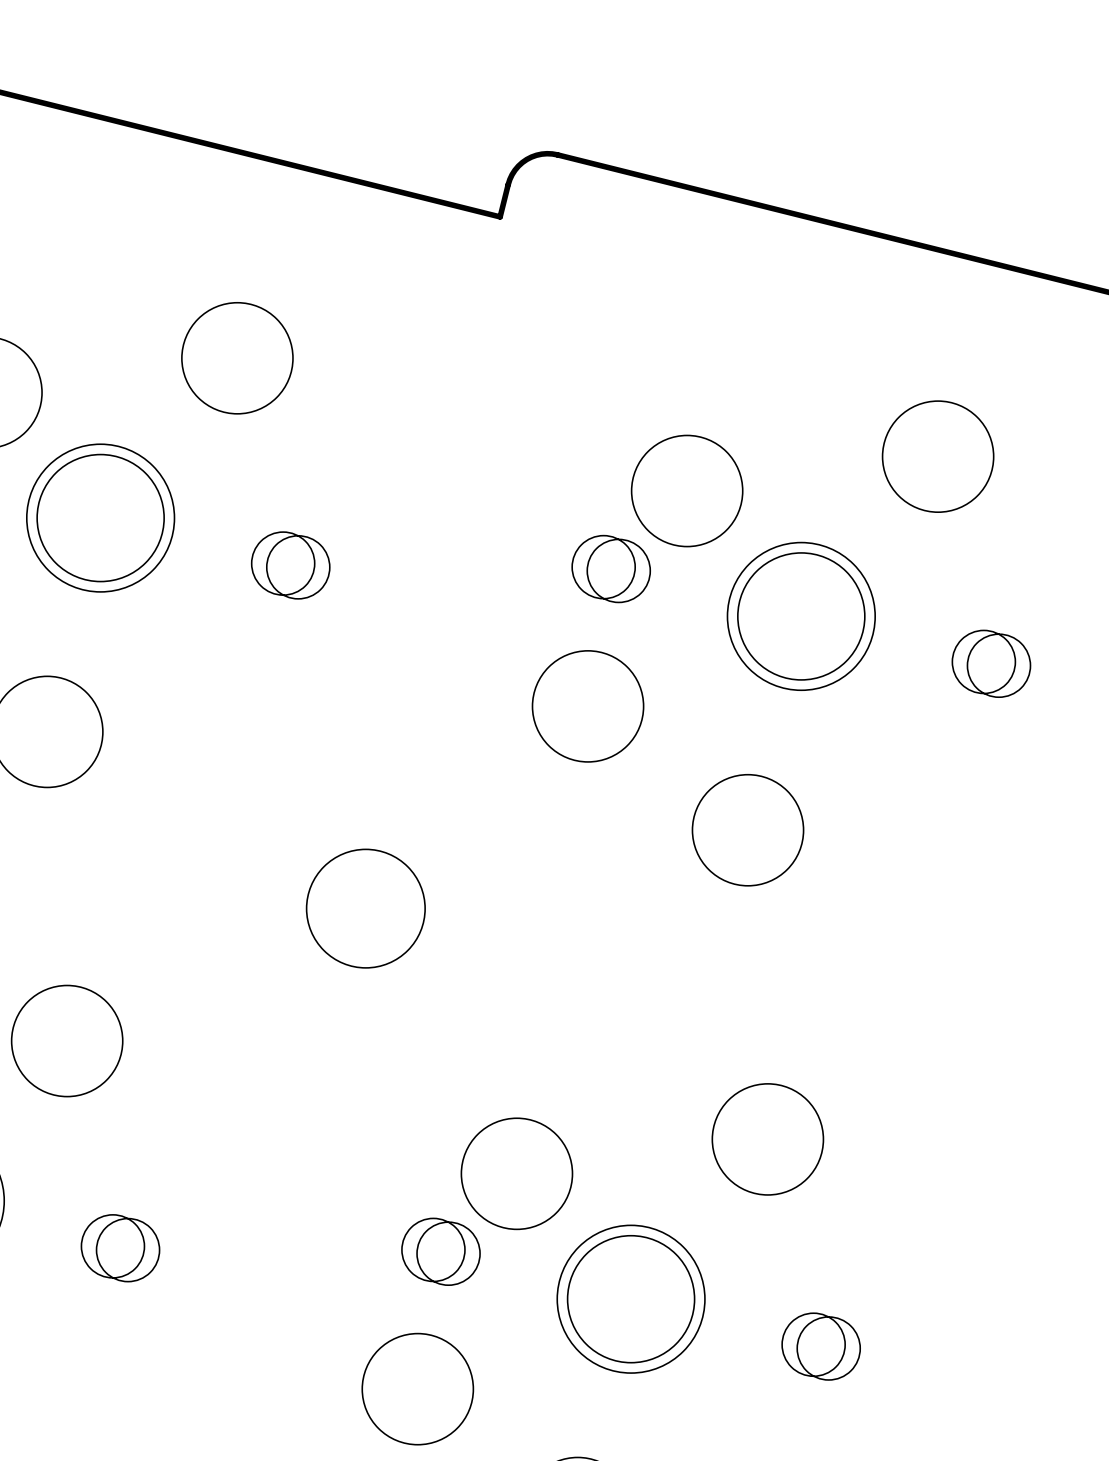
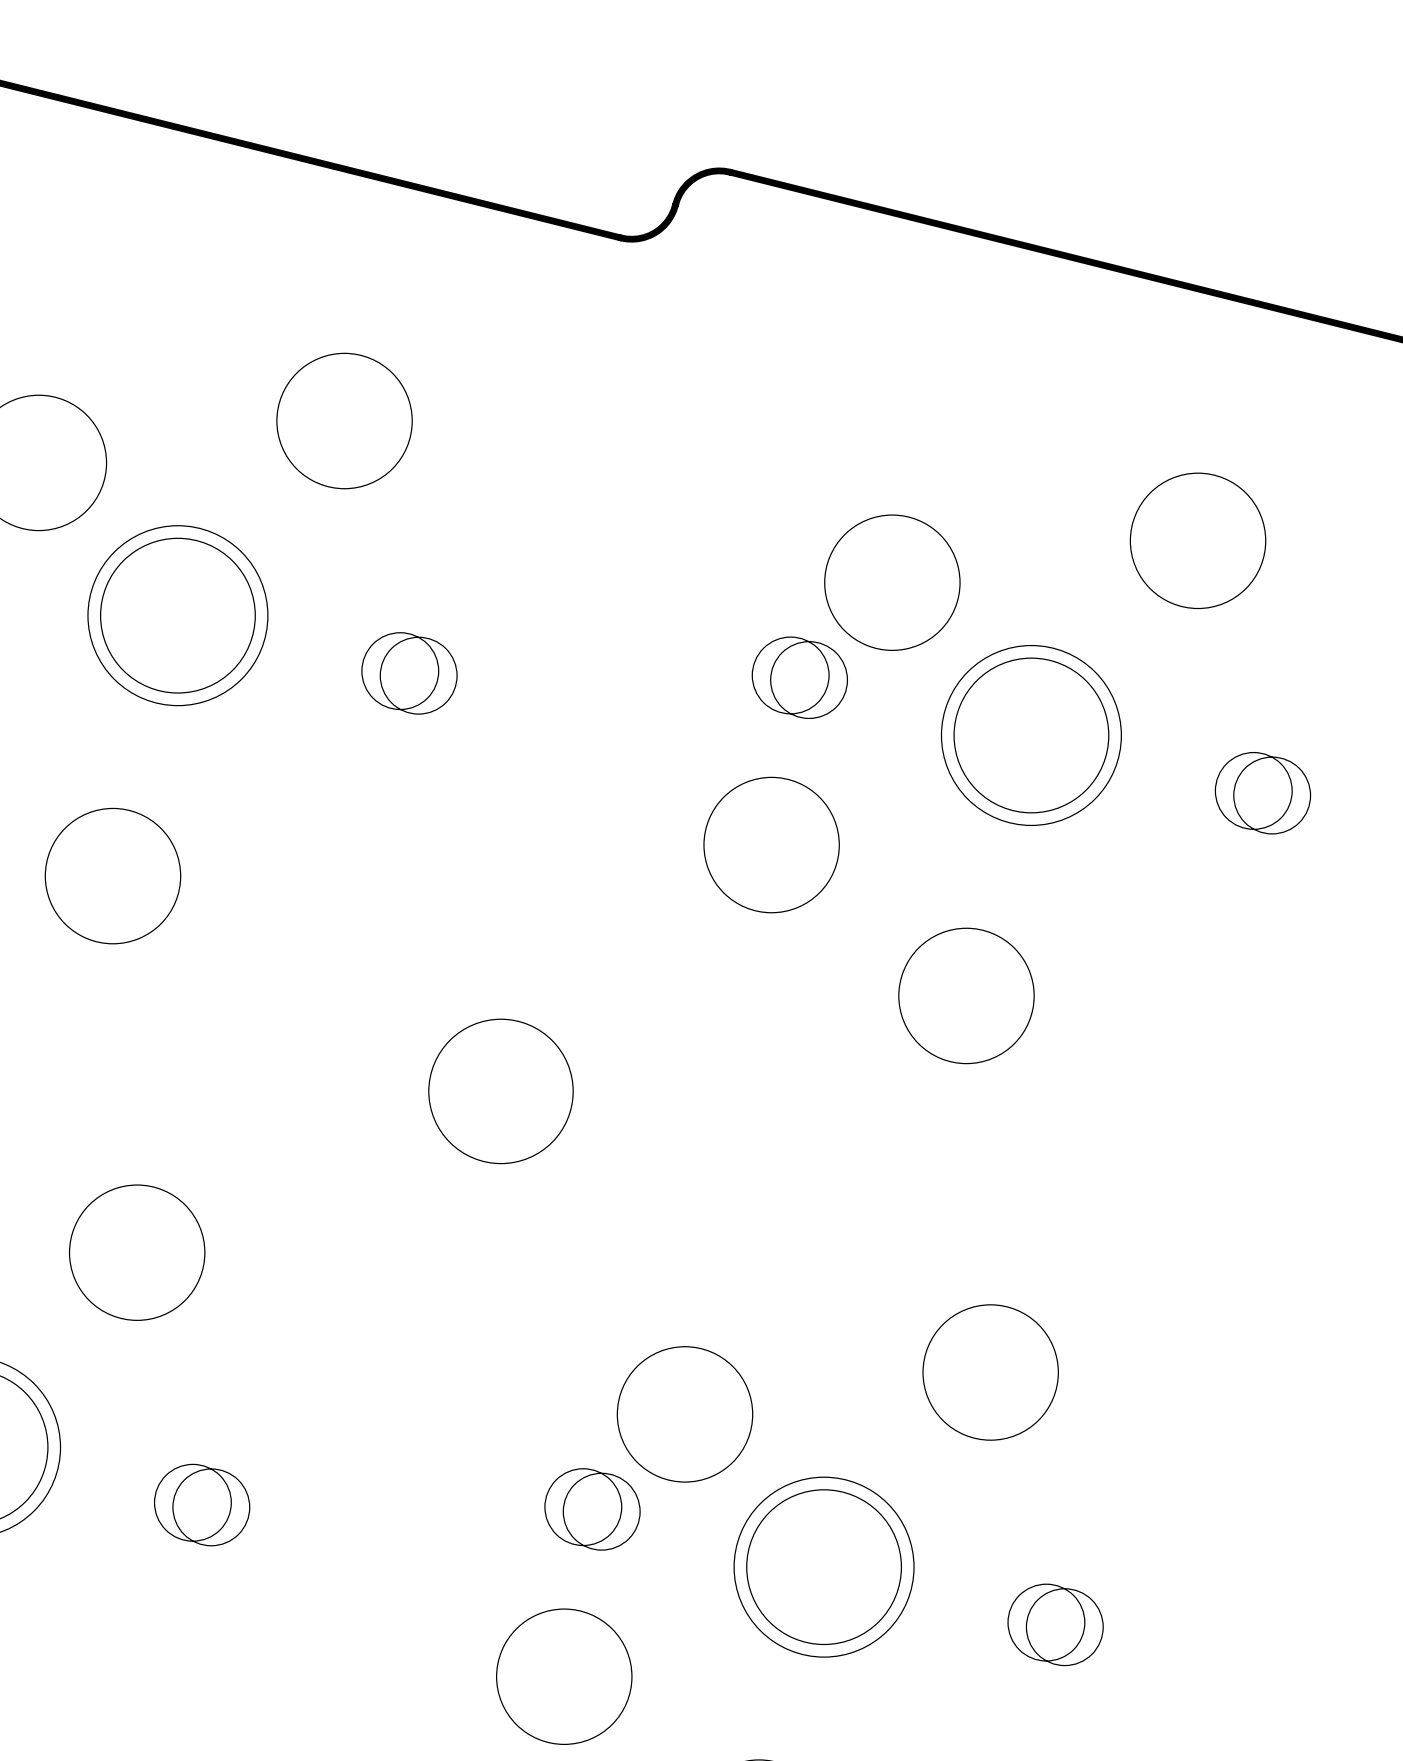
board edge: (557, 154) (536, 155) (518, 166) (509, 179) (500, 216) (464, 207) -> (734, 173) (712, 171) (696, 177) (683, 189) (671, 216) (659, 229) (649, 235) (638, 238) (620, 237)

